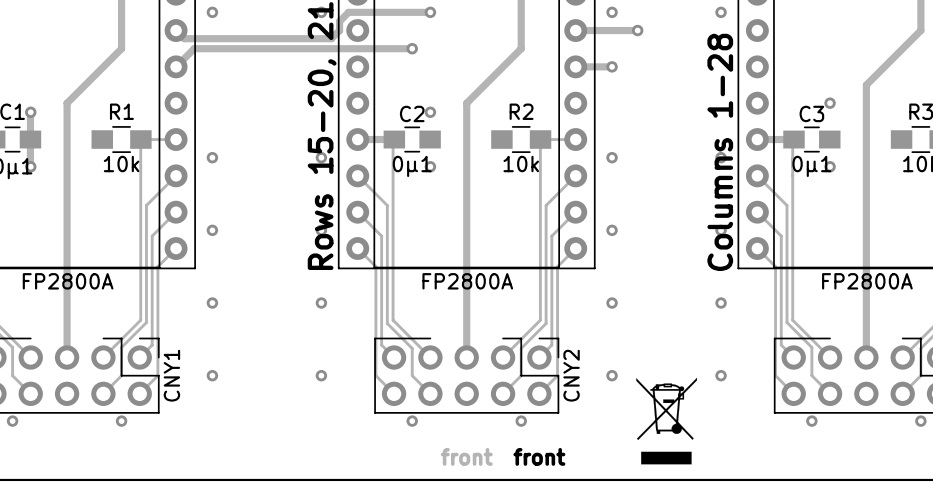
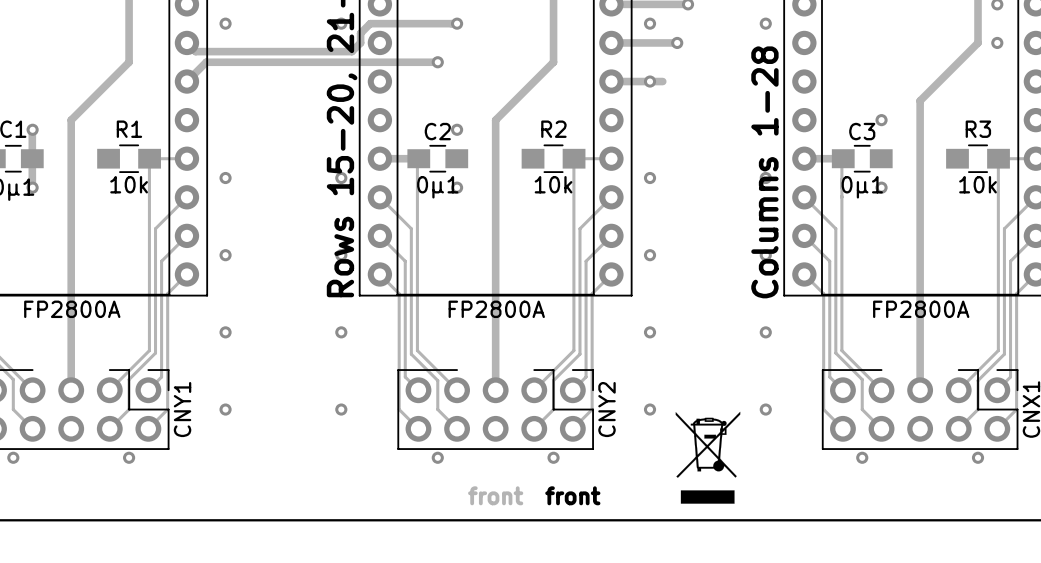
track: none -> (650, 81) (662, 81)

